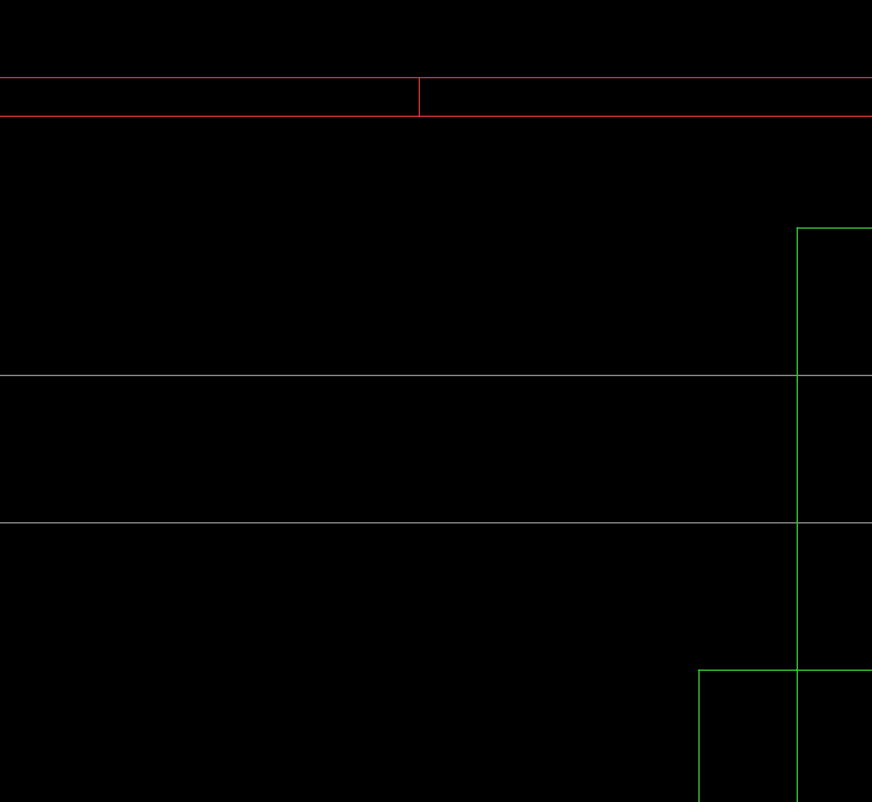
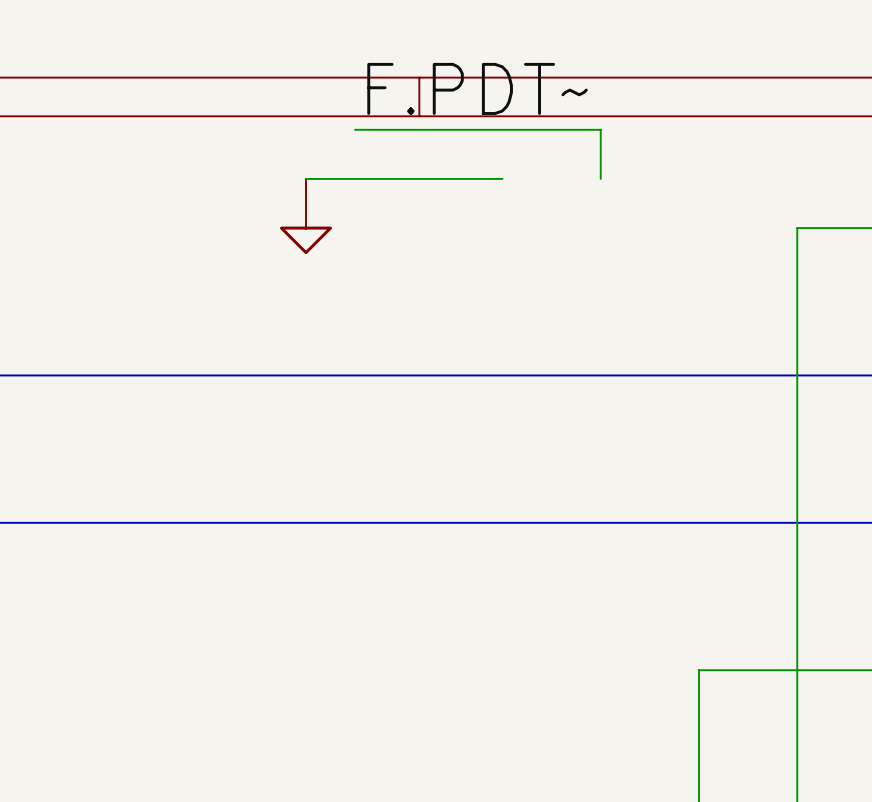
label: none -> F.PDT~ (477, 88)
wire: none -> (355, 129) (600, 129) (600, 178)
wire: none -> (305, 178) (502, 178)
power symbol: none -> (305, 216)

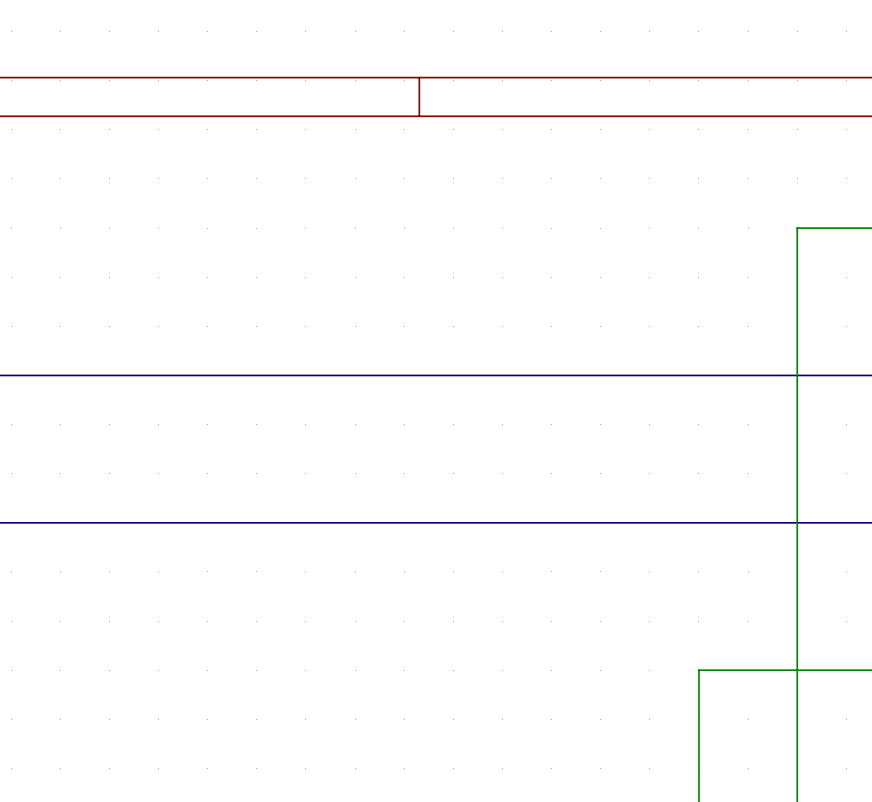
label: F.PDT~ (477, 88) -> none
wire: (355, 129) (600, 129) (600, 178) -> none
wire: (305, 178) (502, 178) -> none
power symbol: (305, 216) -> none

